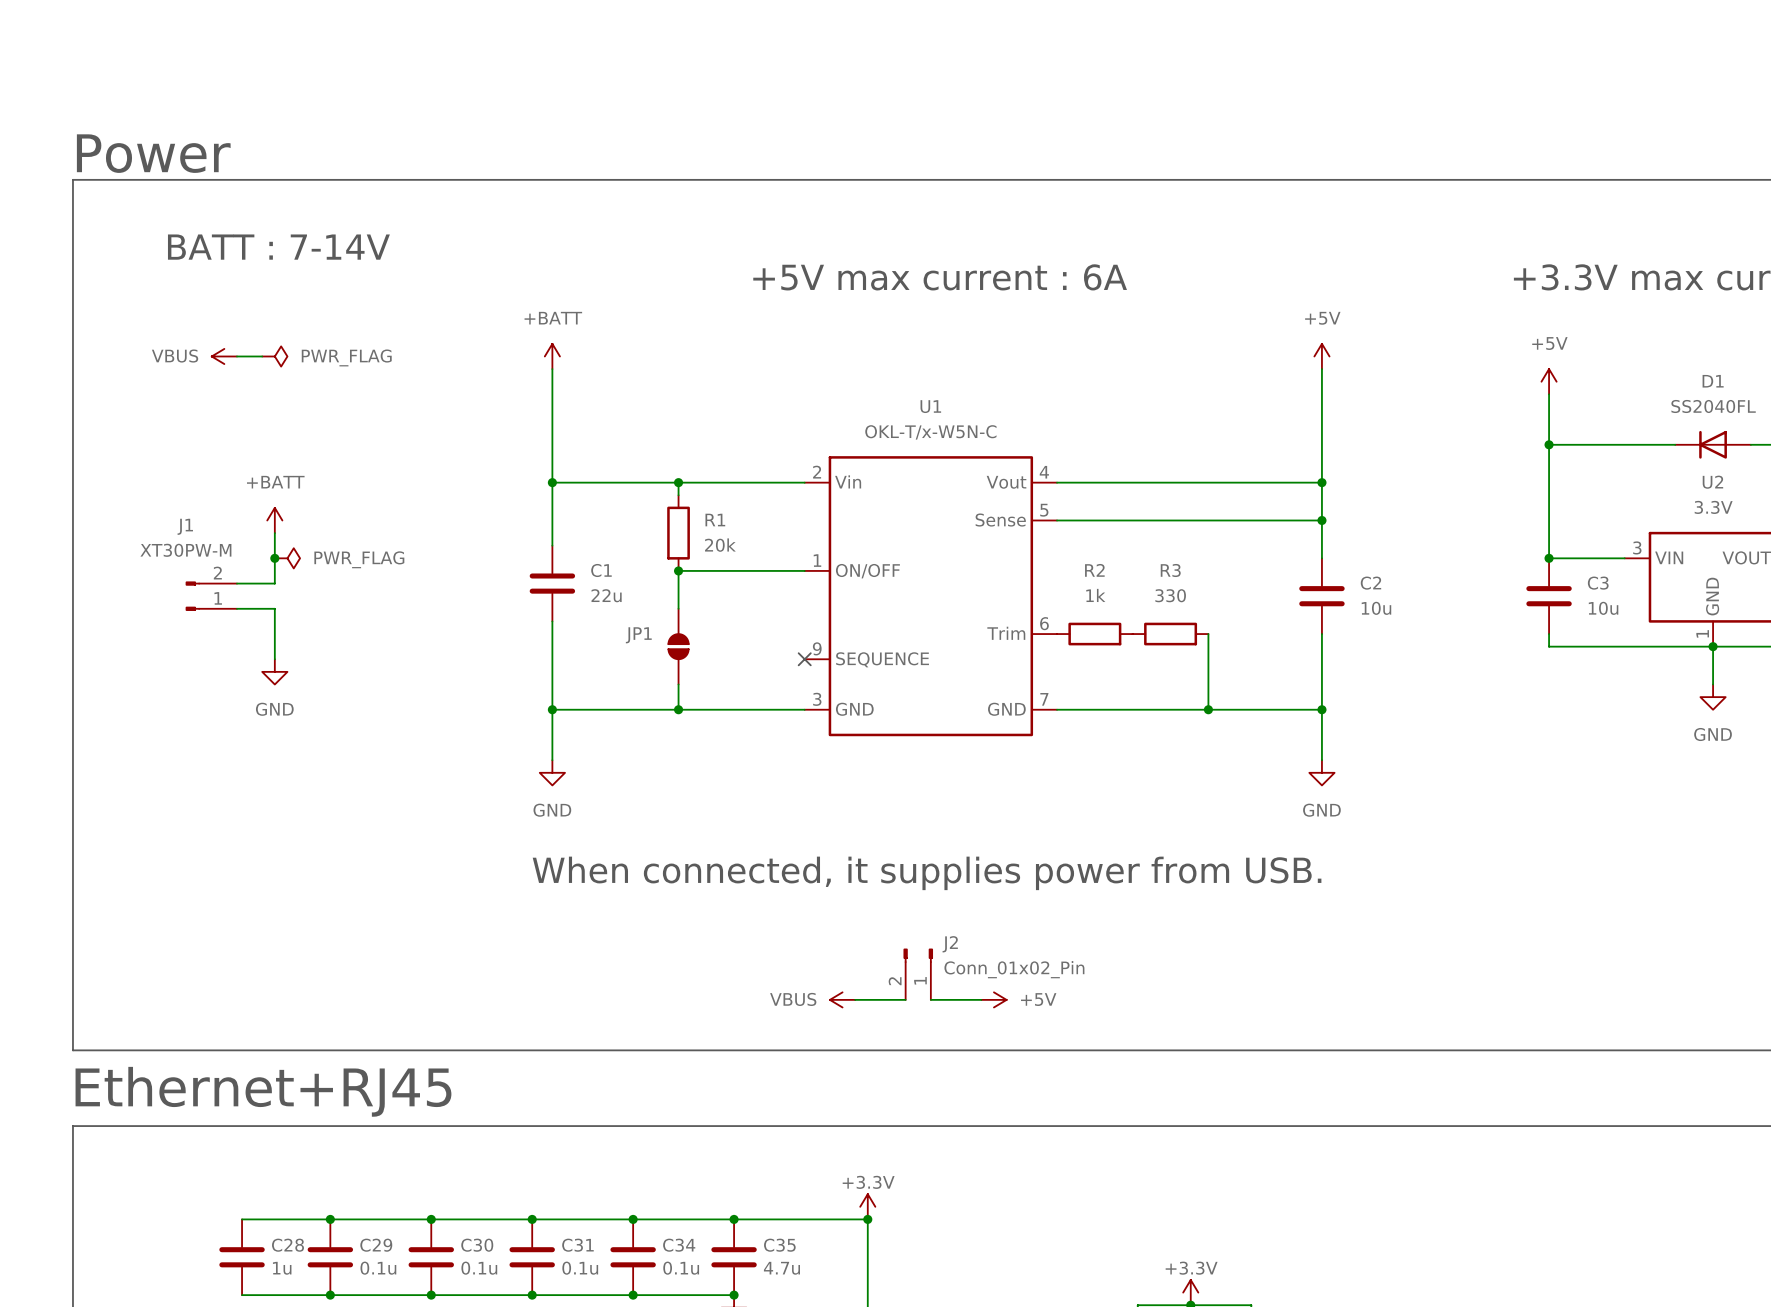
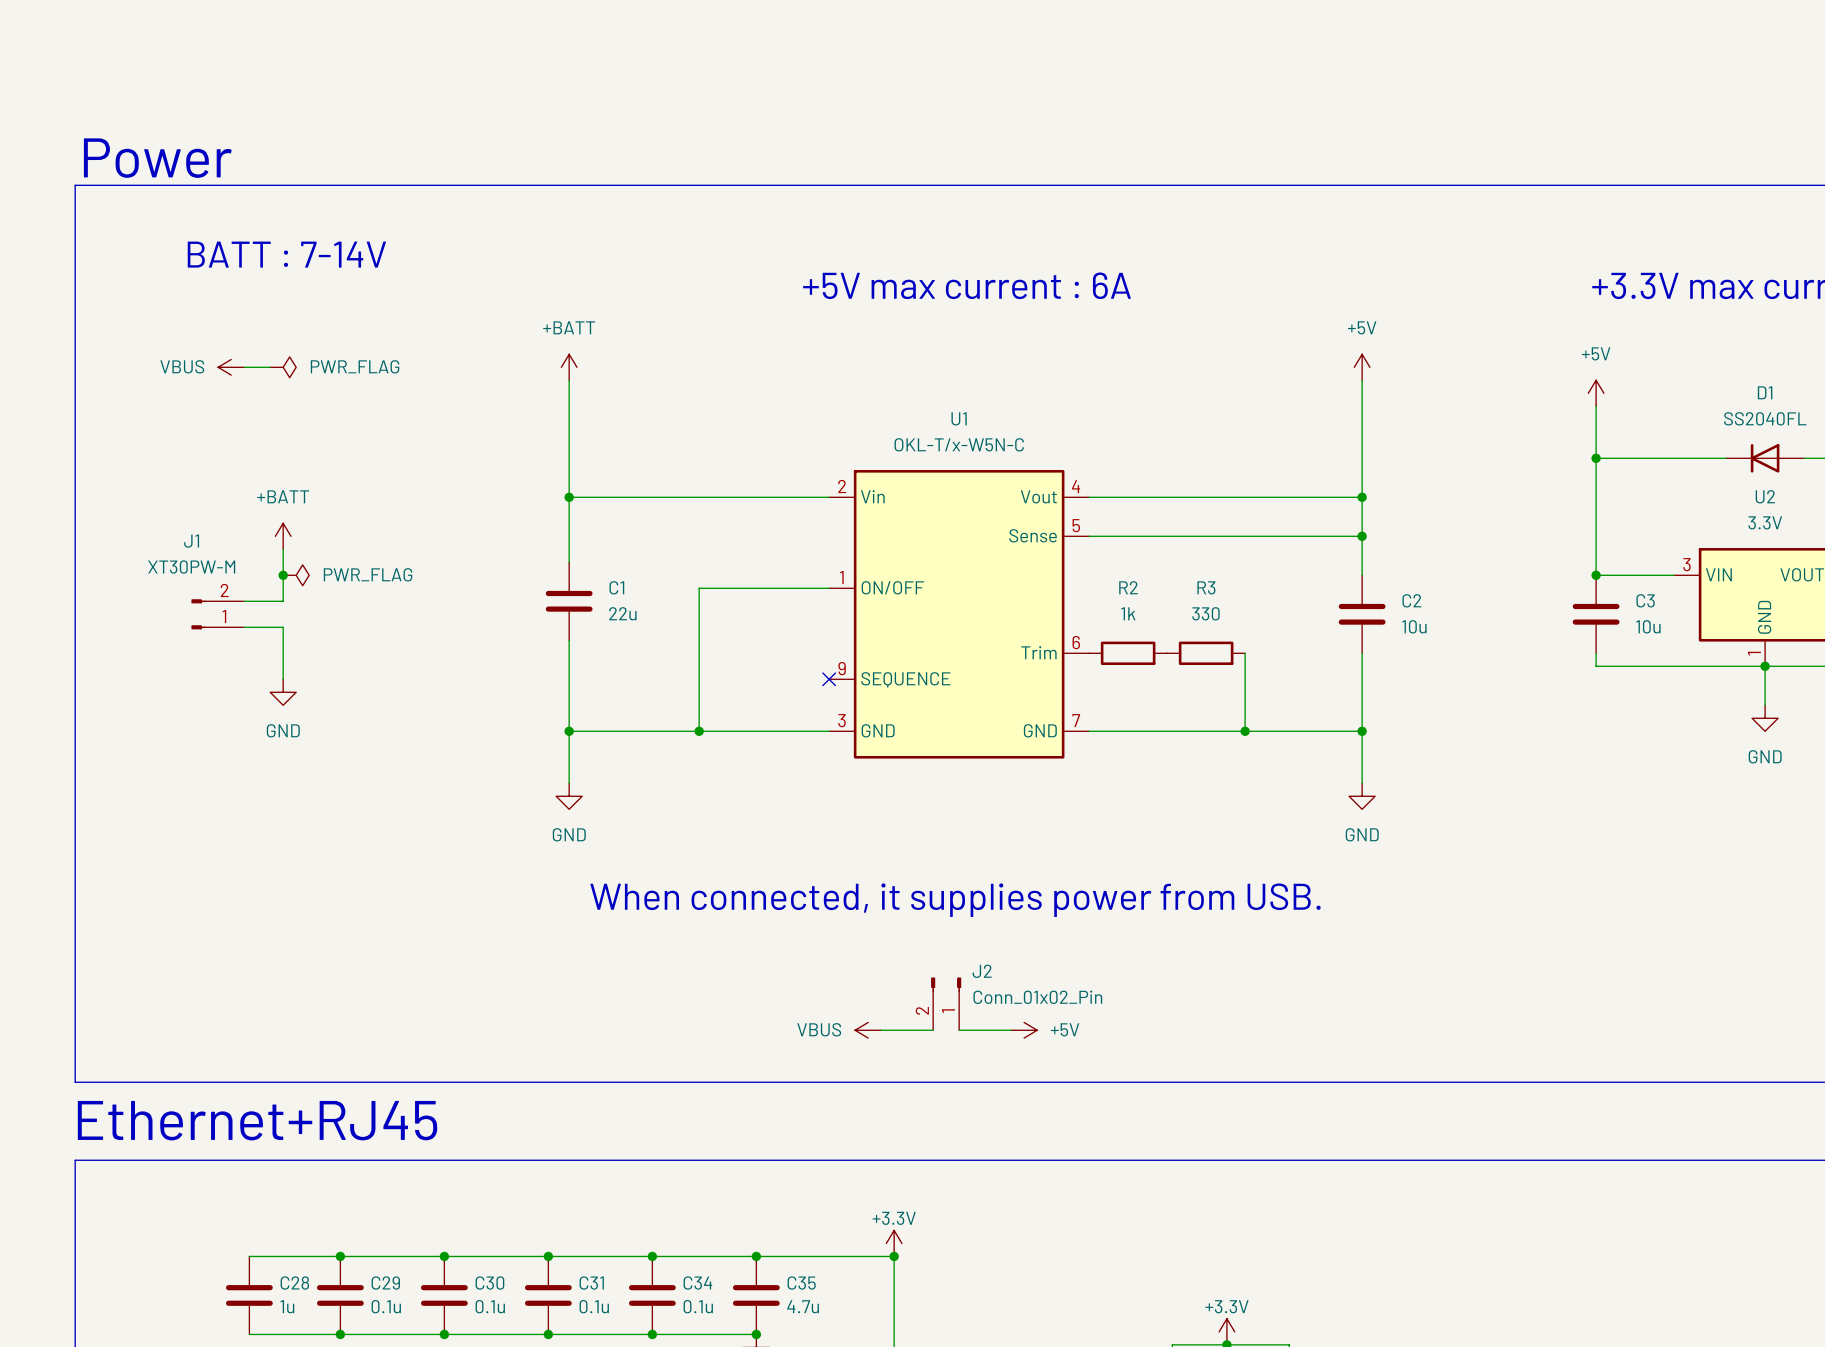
wire: (678, 482) (678, 495) -> none
junction: (678, 482) -> none
R1: 20k (678, 533) -> none
junction: (678, 570) -> none
JP1: (678, 646) -> none

